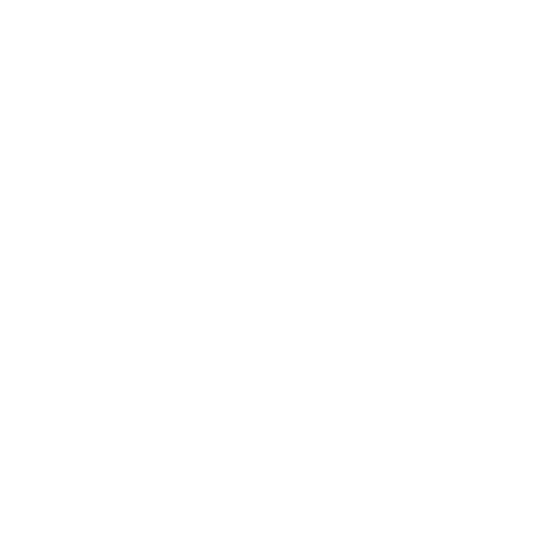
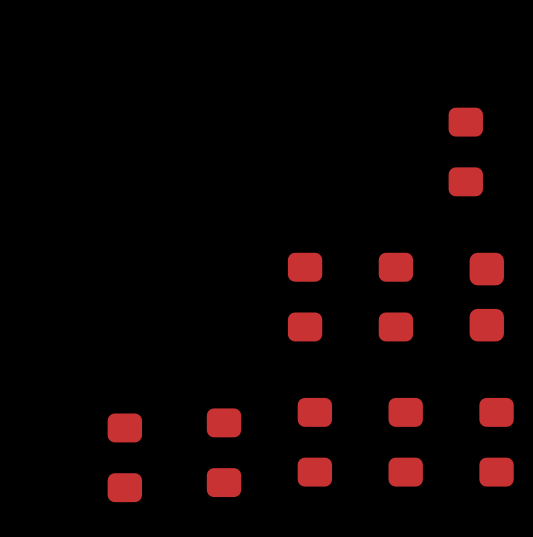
part: none -> (465, 151)
part: none -> (305, 297)
part: none -> (395, 297)
part: none -> (486, 297)
part: none -> (314, 442)
part: none -> (405, 442)
part: none -> (496, 442)
part: none -> (224, 452)
part: none -> (124, 457)

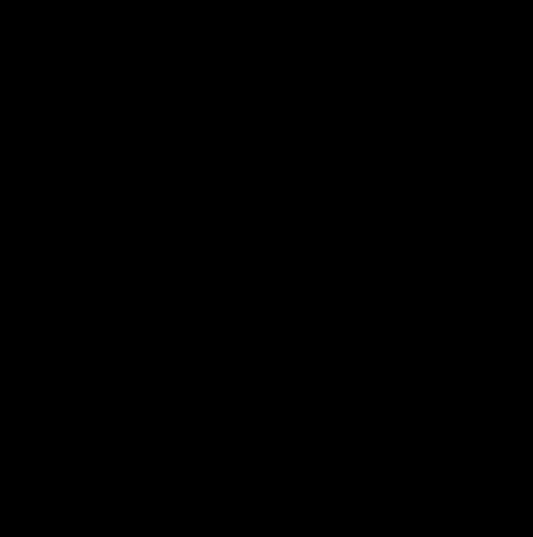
part: (465, 151) -> none
part: (305, 297) -> none
part: (395, 297) -> none
part: (486, 297) -> none
part: (314, 442) -> none
part: (405, 442) -> none
part: (496, 442) -> none
part: (224, 452) -> none
part: (124, 457) -> none

